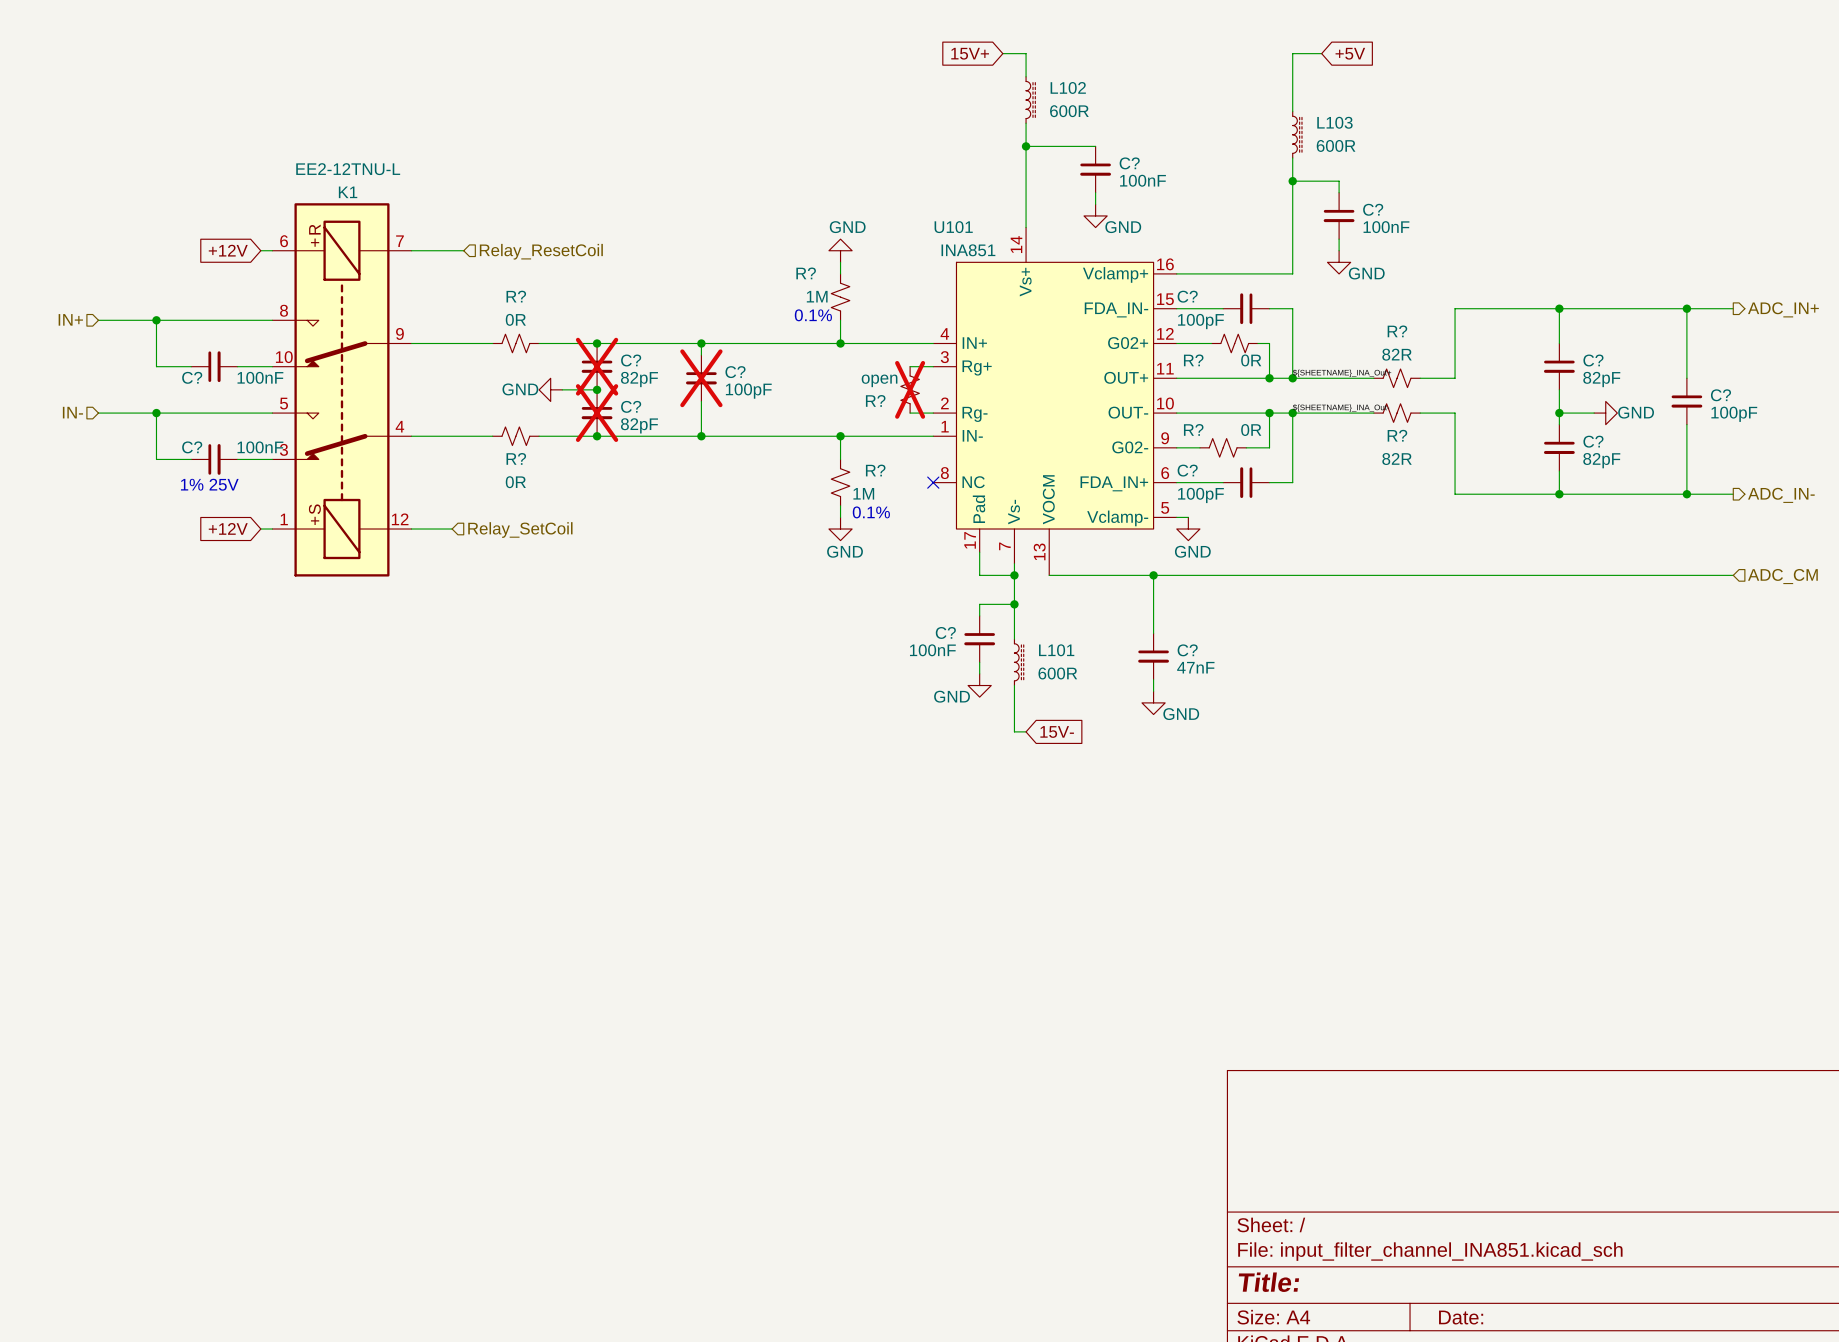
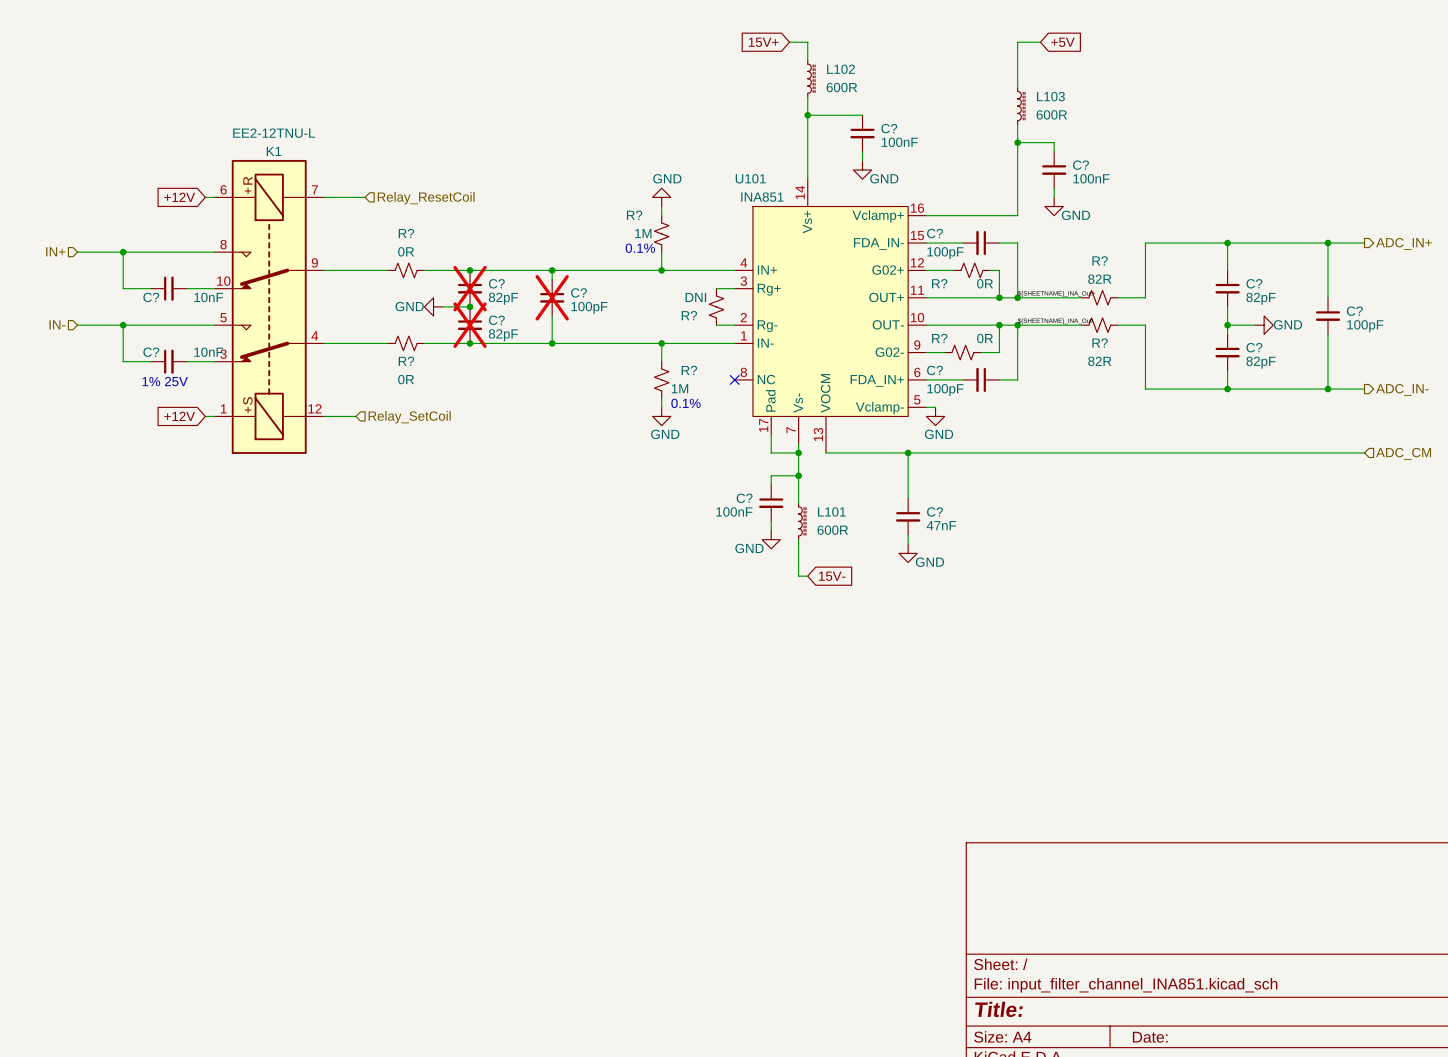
C? value: 100nF (260, 377) -> 10nF (208, 297)
R? value: open (879, 380) -> DNI (695, 297)
R? do-not-place cross: (910, 389) -> none
C? value: 100nF (260, 447) -> 10nF (208, 352)

